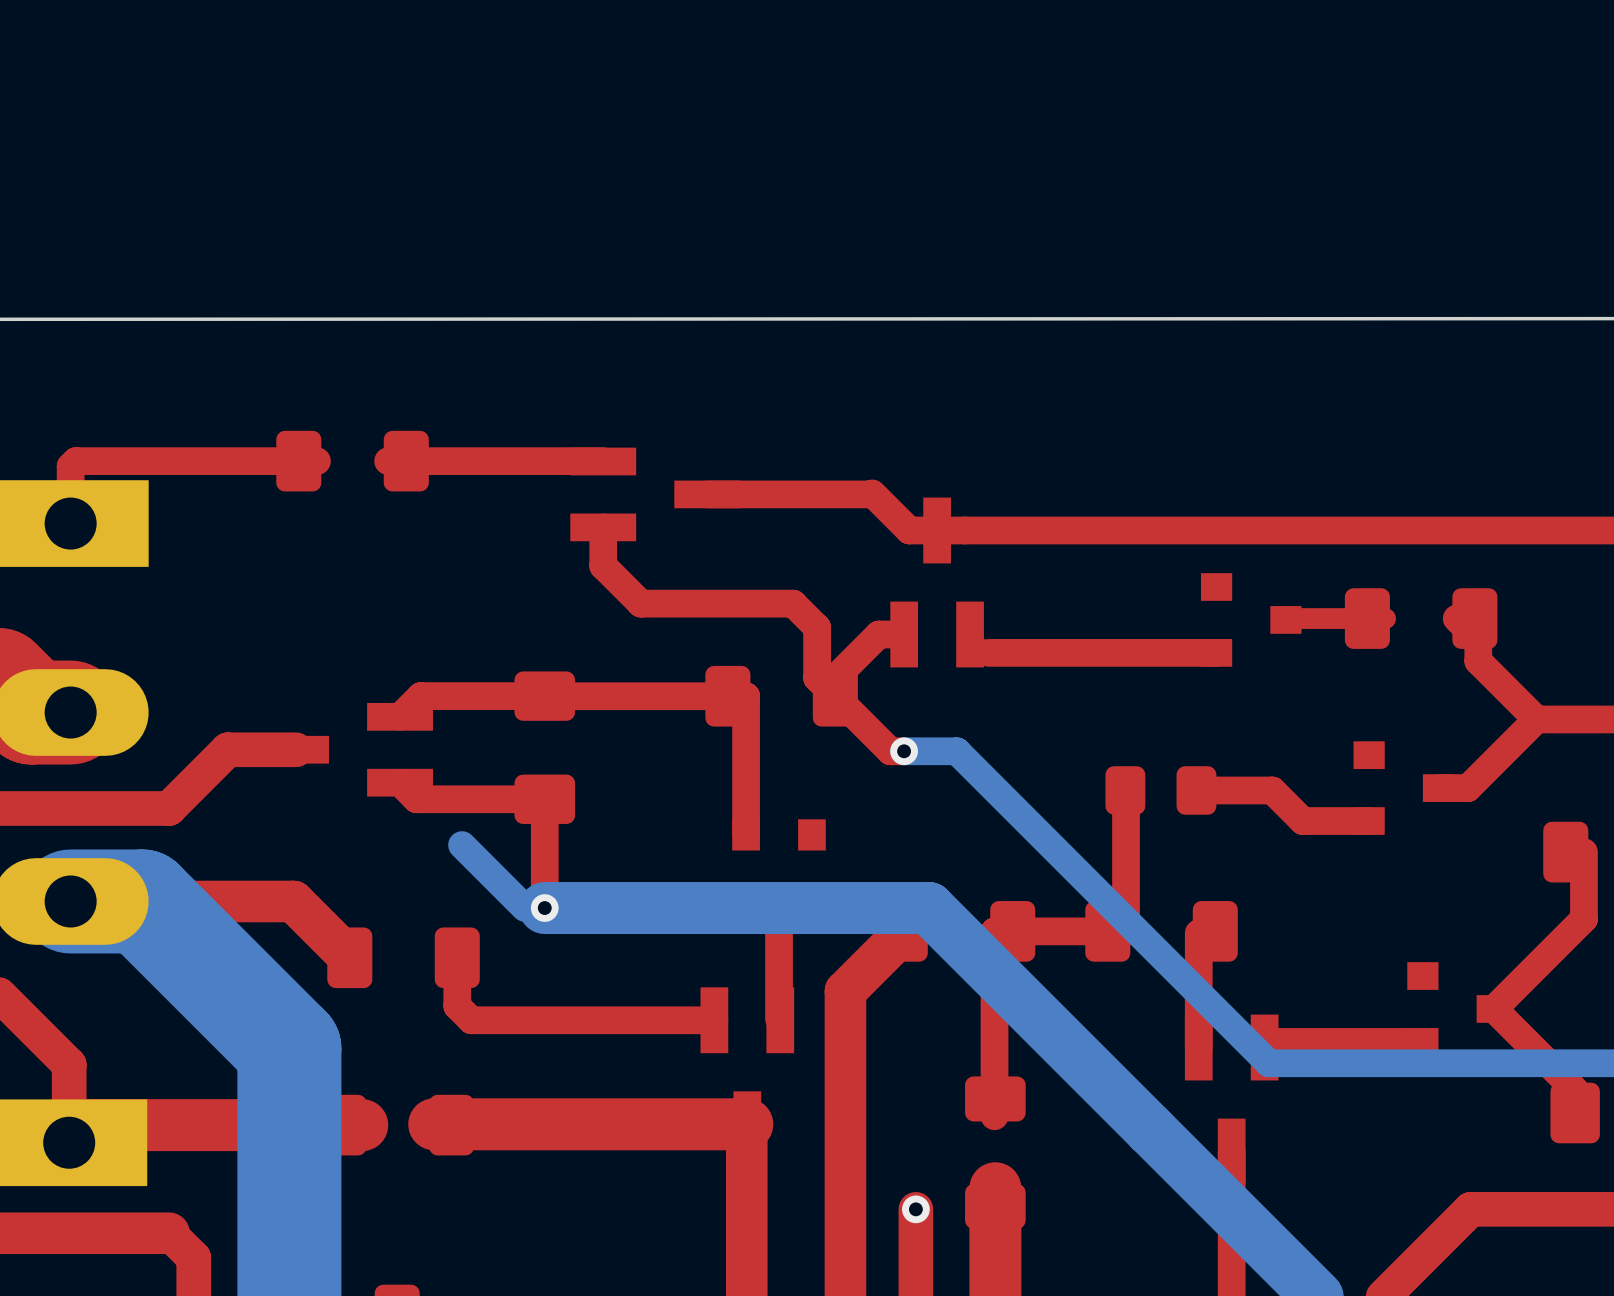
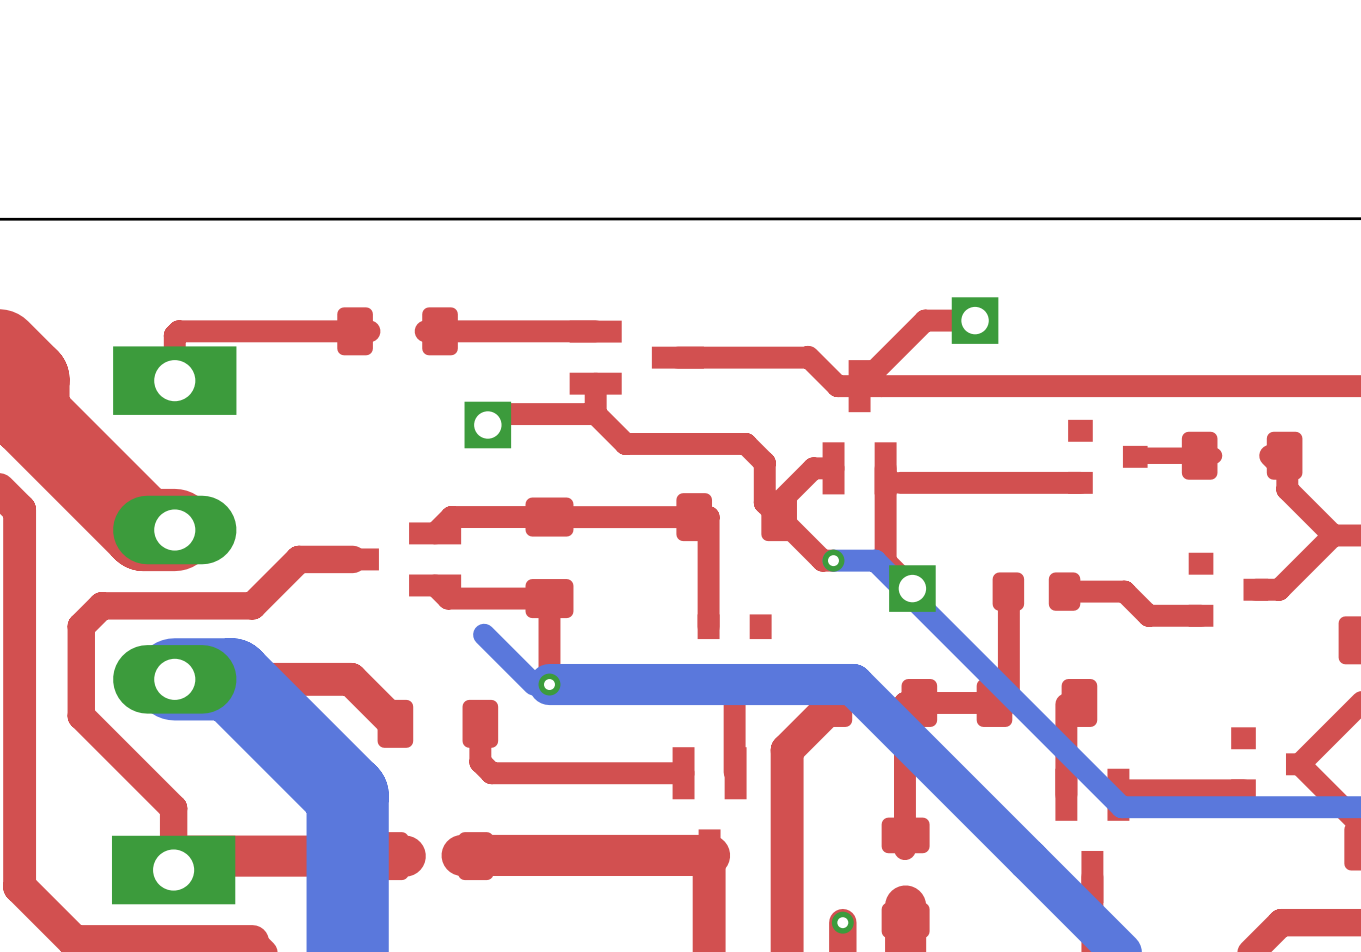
top track: none -> (975, 320) (925, 320) (859, 386)
part: none -> (975, 320)
top track: none -> (595, 414) (498, 414) (487, 424)
part: none -> (487, 424)
top track: none -> (885, 468) (885, 561) (912, 588)
part: none -> (912, 588)

